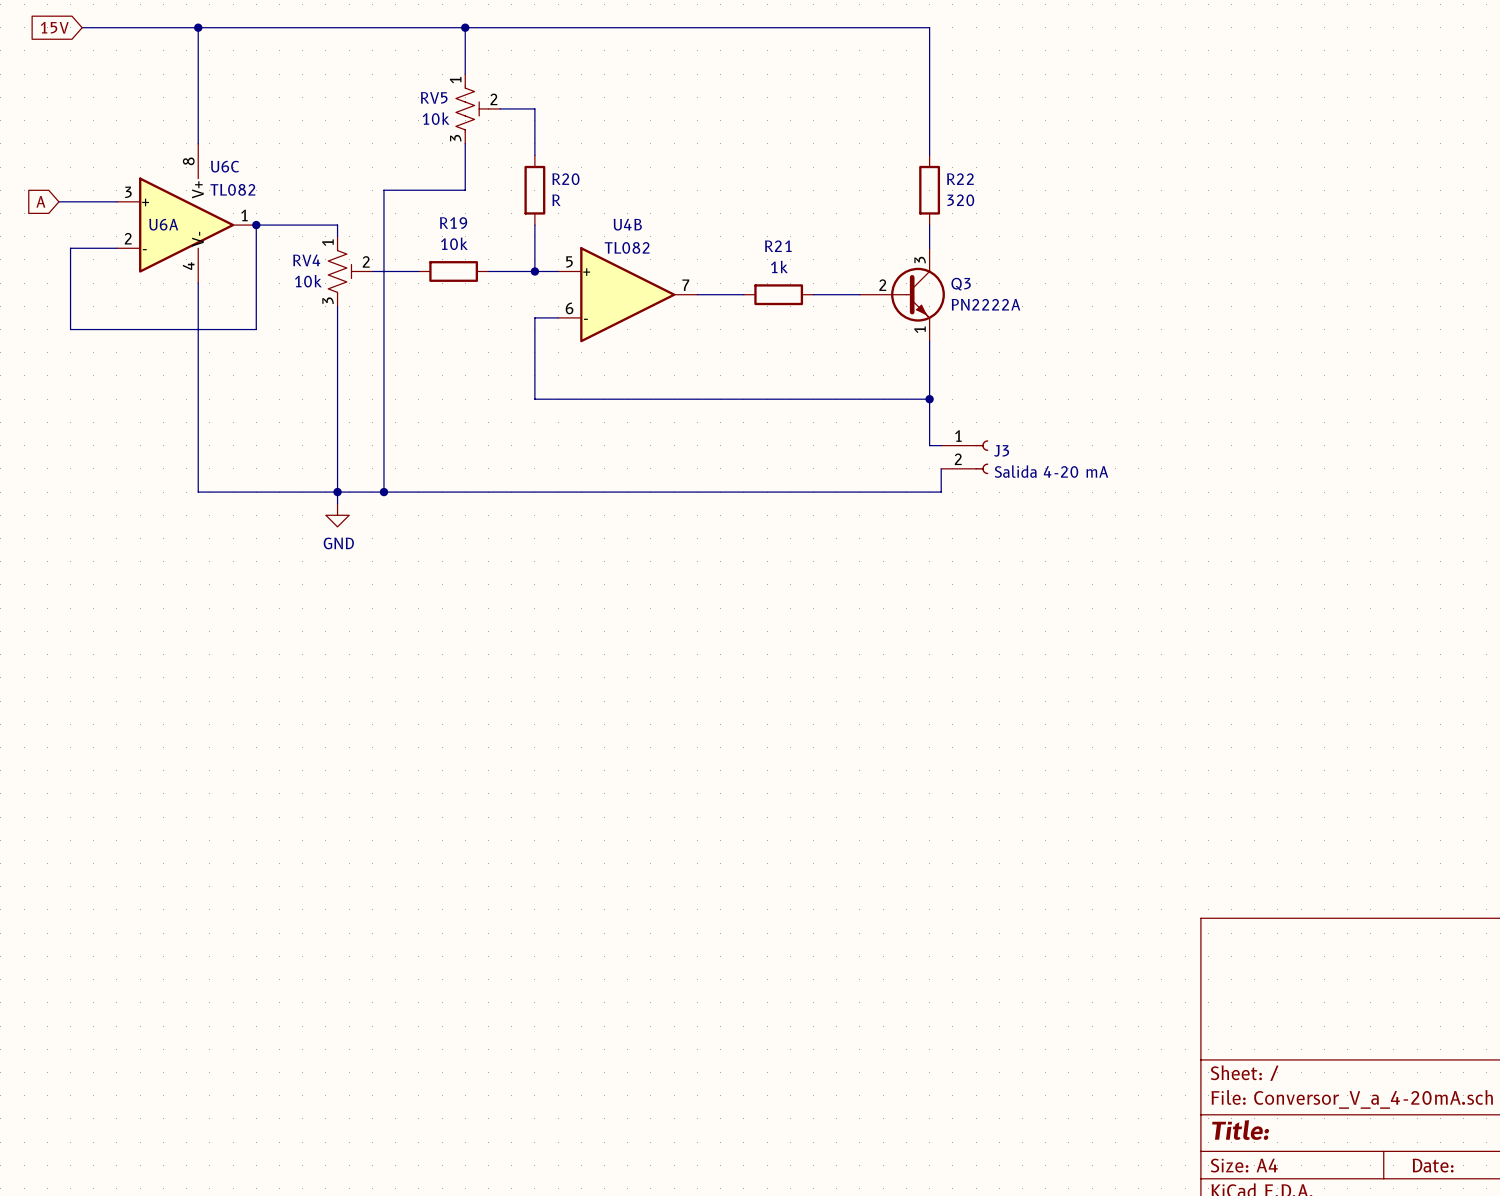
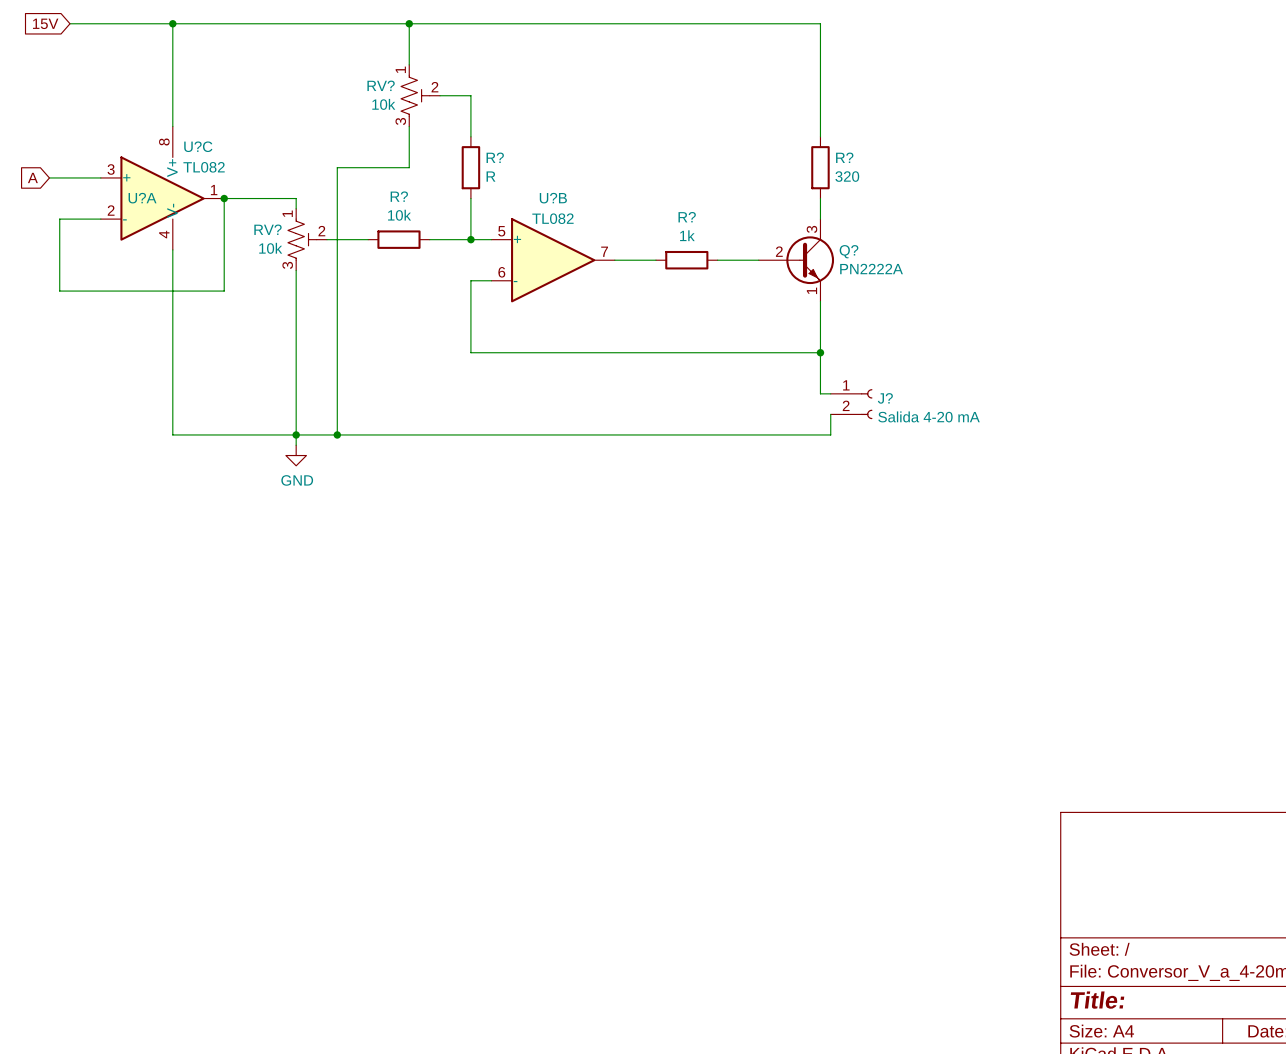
RV5 name: RV5 (434, 97) -> RV? (381, 85)
U6C name: U6C (225, 166) -> U?C (198, 146)
R20 name: R20 (565, 179) -> R? (495, 157)
R22 name: R22 (960, 179) -> R? (844, 157)
R19 name: R19 (453, 223) -> R? (399, 196)
U6A name: U6A (163, 224) -> U?A (142, 198)
U4B name: U4B (627, 224) -> U?B (553, 198)
R21 name: R21 (778, 246) -> R? (687, 217)
RV4 name: RV4 (306, 260) -> RV? (267, 229)
Q3 name: Q3 (961, 284) -> Q? (849, 251)
J3 name: J3 (1001, 450) -> J? (885, 398)

